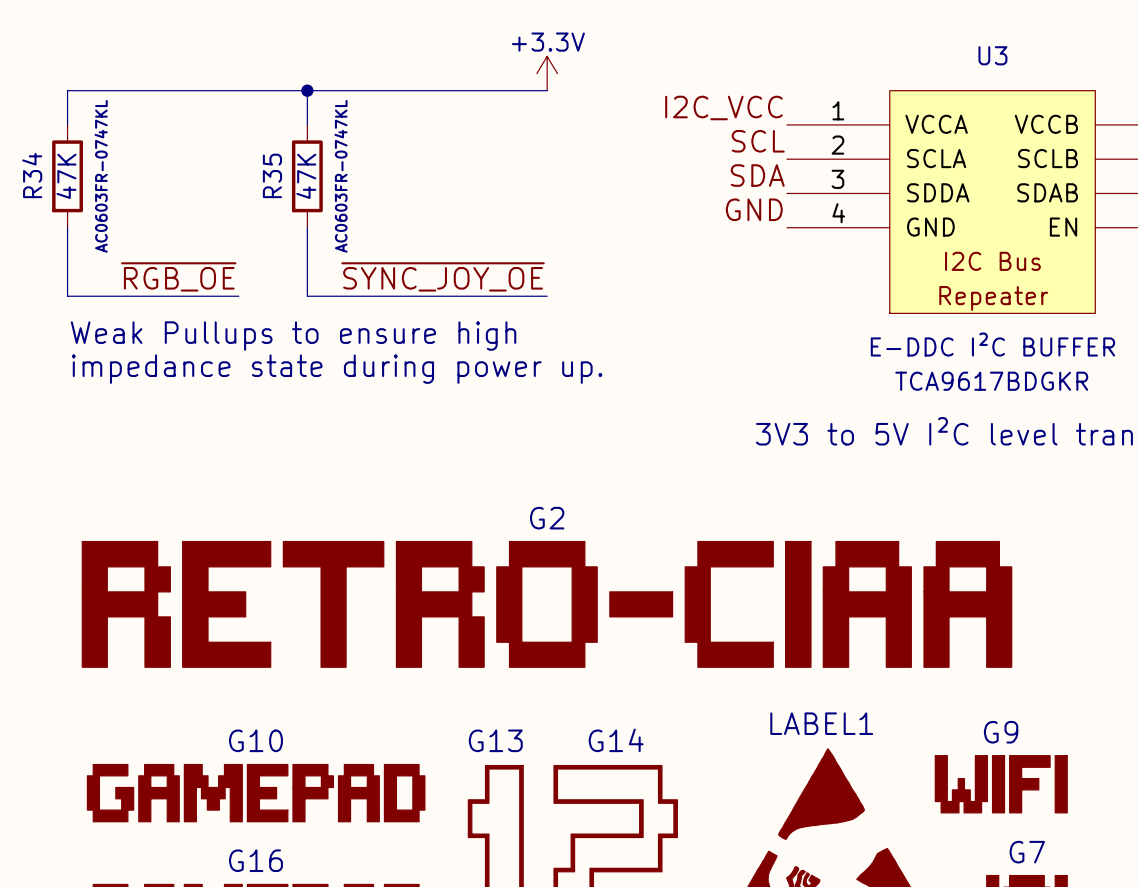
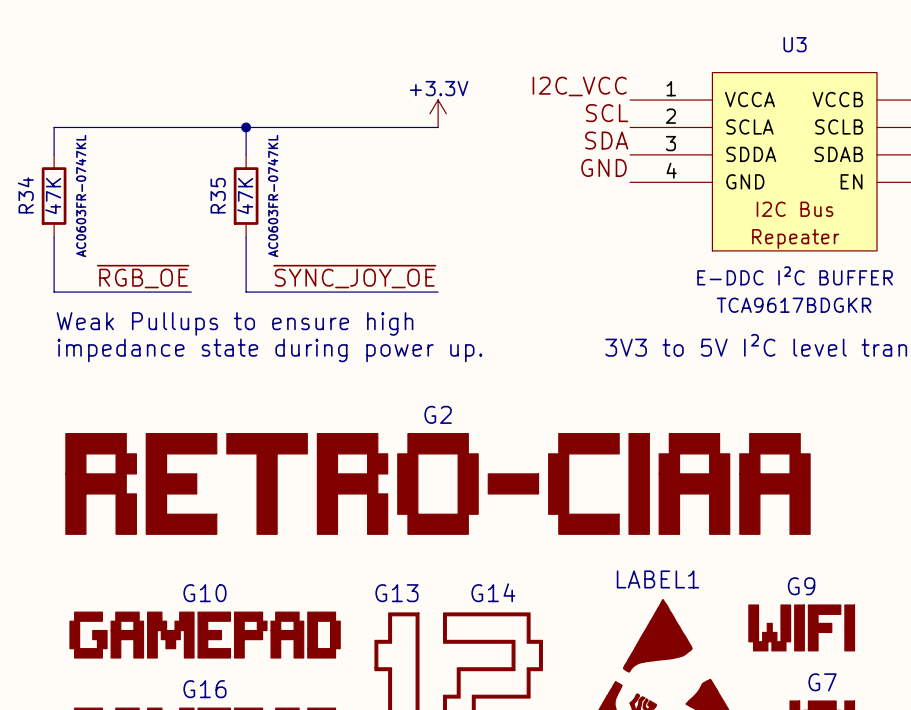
power symbol position: +3.3V (547, 73) -> +3.3V (438, 113)
wire: (307, 90) (307, 124) -> (246, 127) (246, 154)
junction position: (307, 90) -> (246, 127)
wire: (547, 90) (67, 90) (67, 124) -> (438, 127) (54, 127) (54, 154)
R34 position: (67, 176) -> (54, 196)
R35 position: (307, 176) -> (246, 196)
wire: (67, 227) (67, 296) (238, 296) -> (54, 237) (54, 292) (191, 292)
wire: (307, 227) (307, 296) (547, 296) -> (246, 237) (246, 292) (438, 292)
label position: ~{RGB_OE} (178, 276) -> ~{RGB_OE} (143, 276)
label position: ~{SYNC_JOY_OE} (443, 276) -> ~{SYNC_JOY_OE} (354, 276)
text position: Weak Pullups to ensure high (293, 336) -> Weak Pullups to ensure high (235, 323)
text position: impedance state during power up. (337, 369) -> impedance state during power up. (269, 350)

